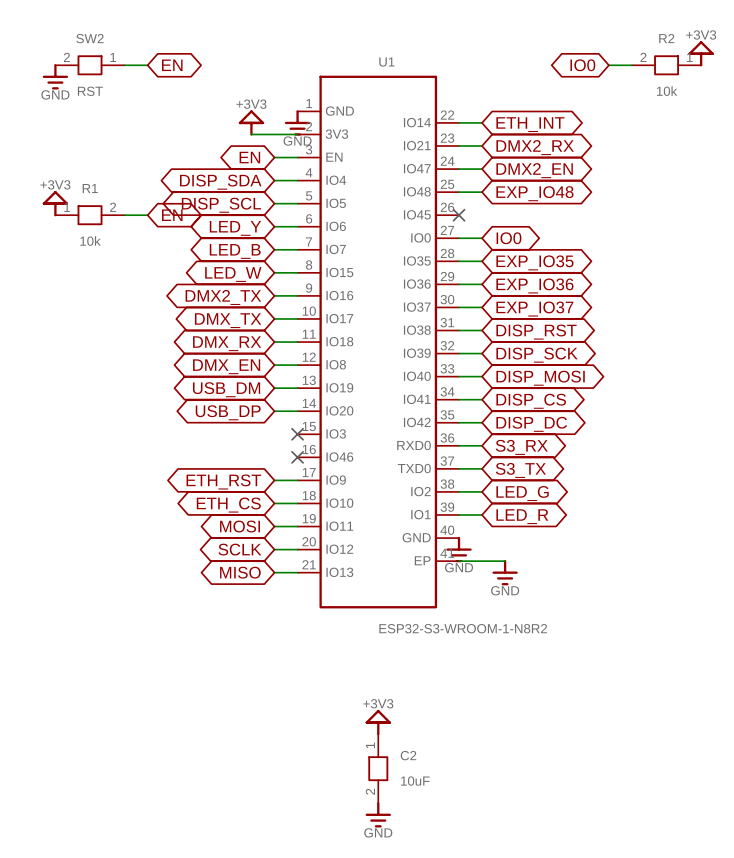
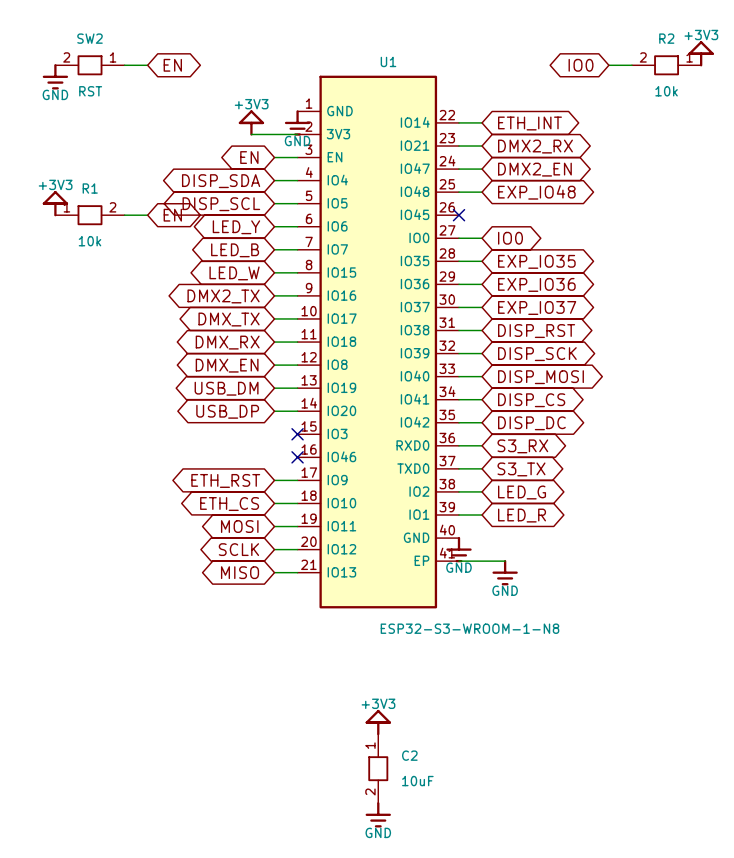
U1 value: ESP32-S3-WROOM-1-N8R2 (463, 628) -> ESP32-S3-WROOM-1-N8 (469, 628)

